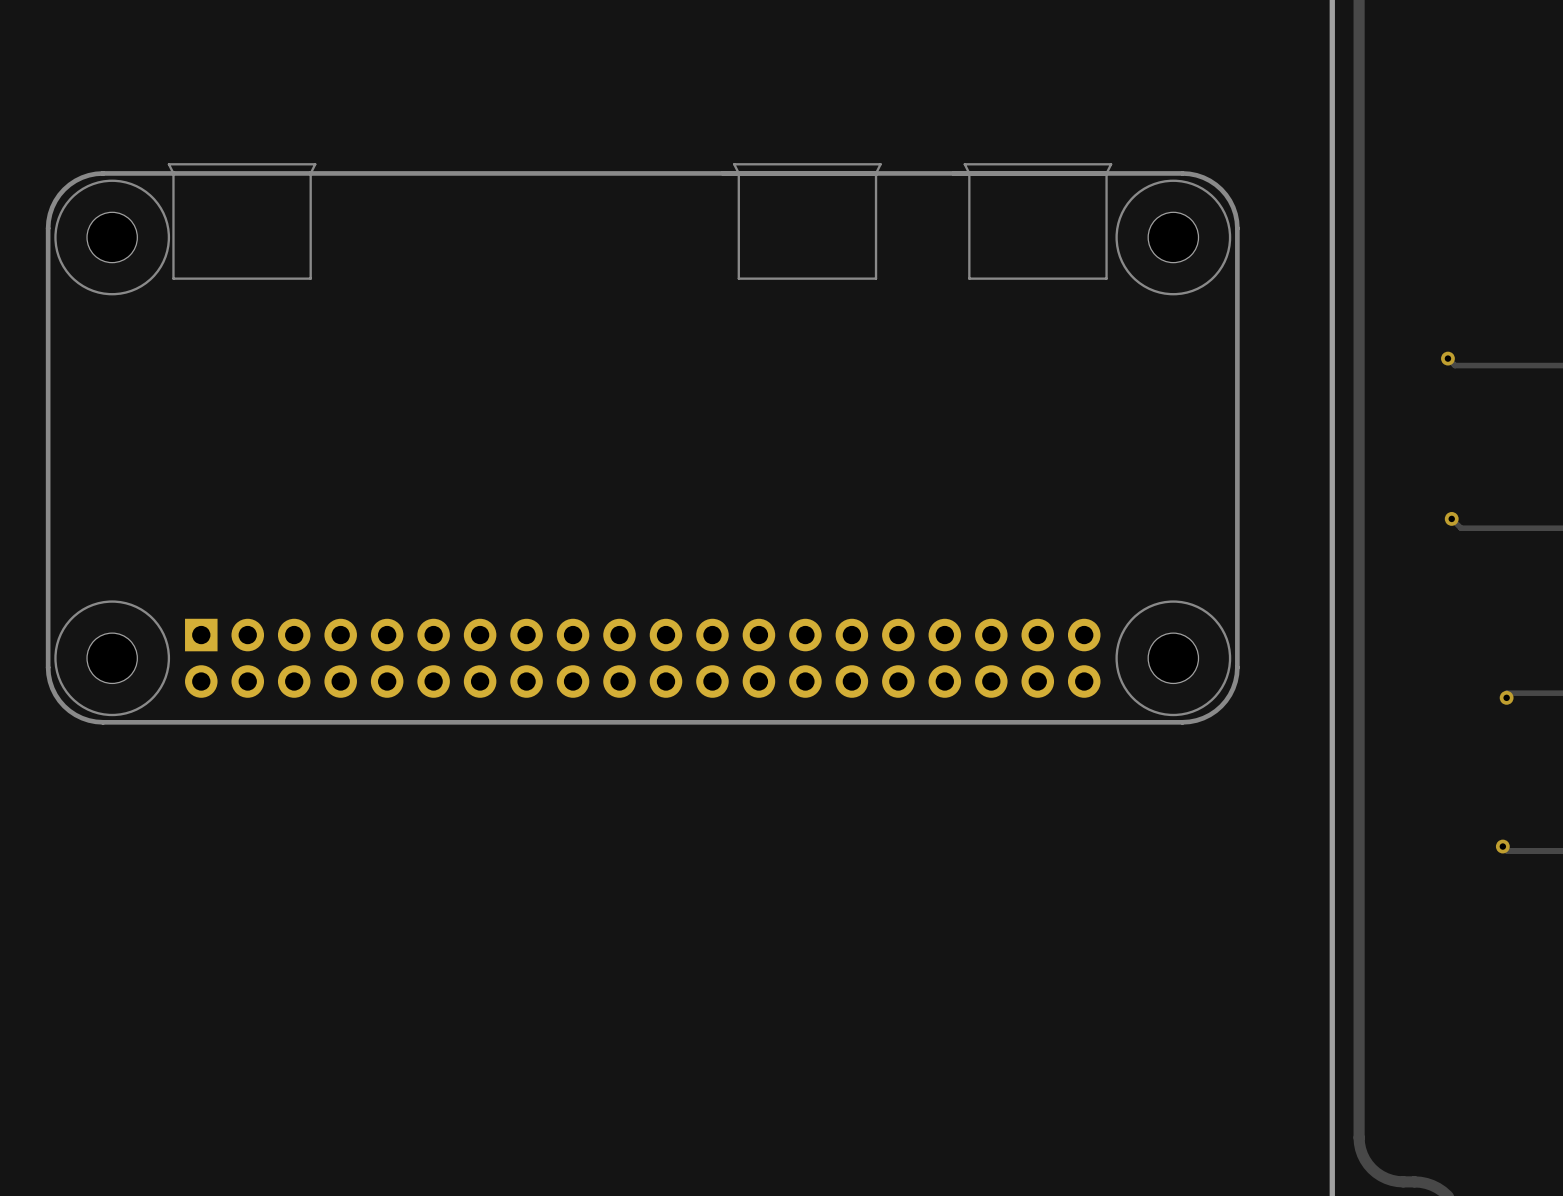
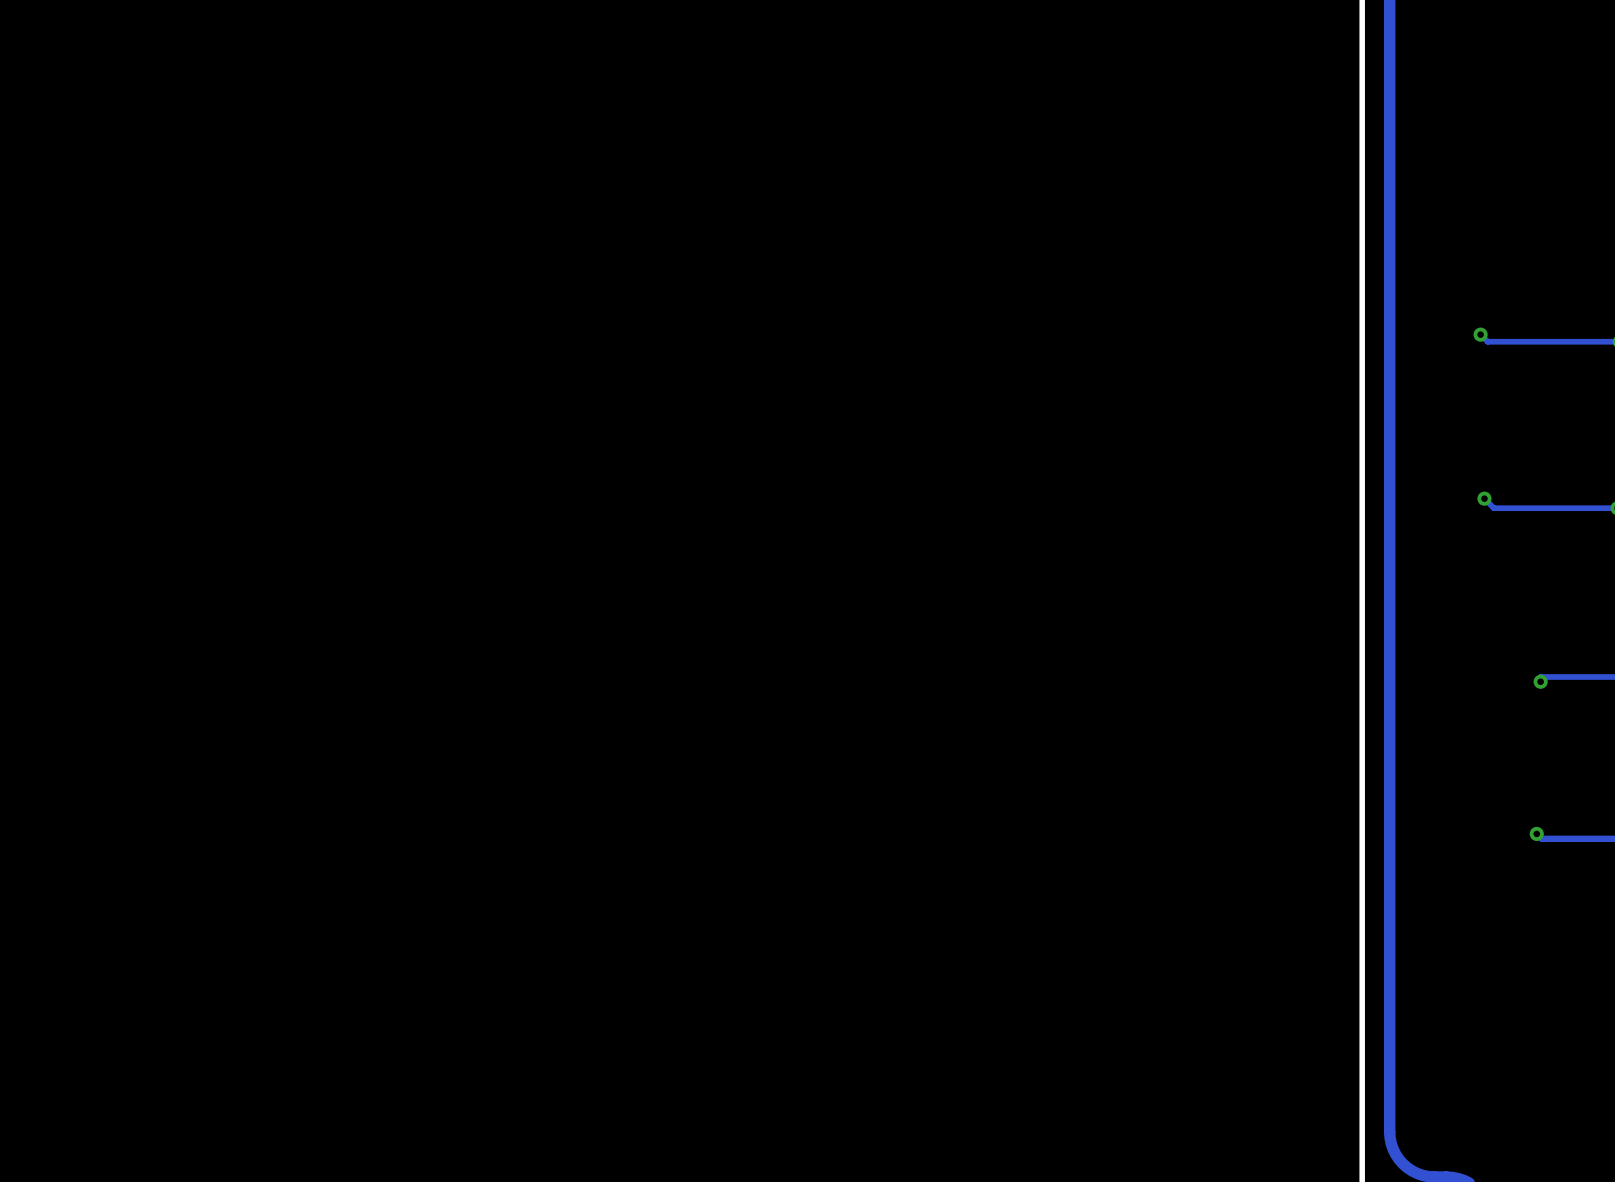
part: (642, 443) -> none

